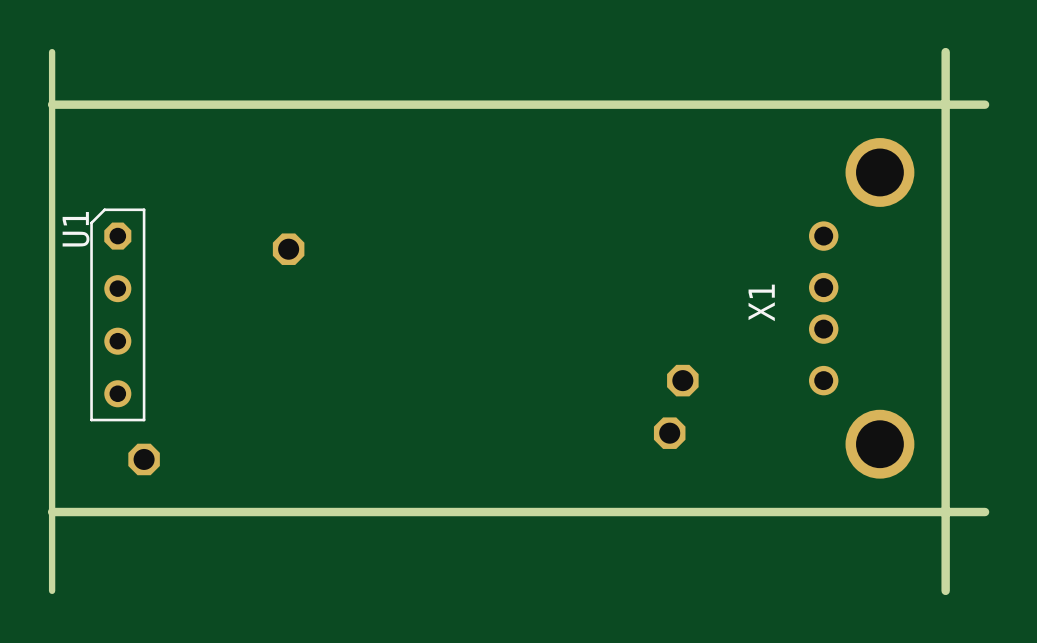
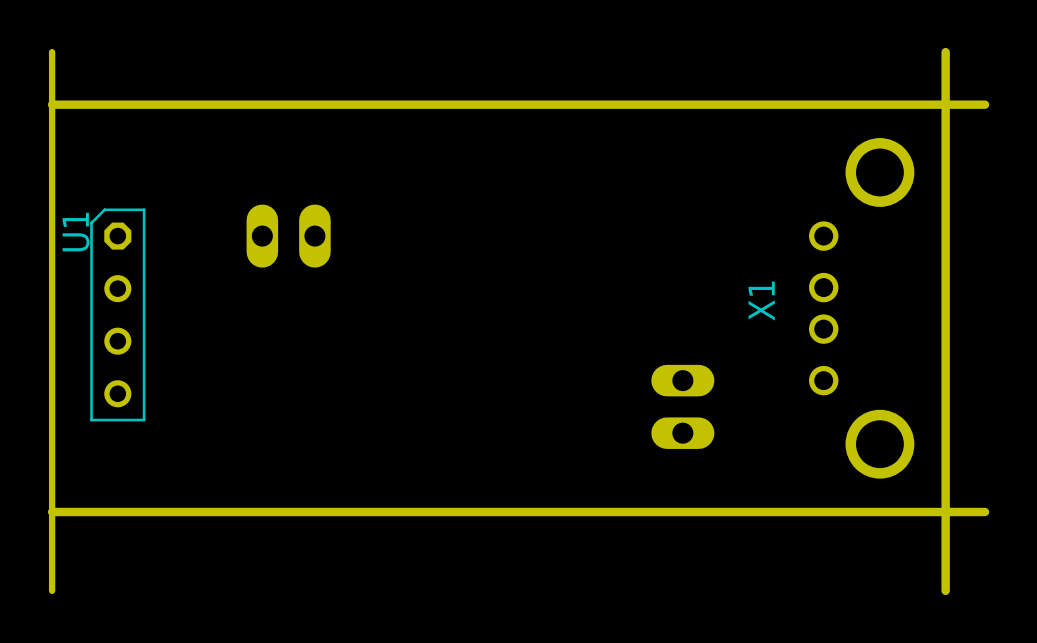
part footprint: [272, 233, 305, 265] -> [246, 204, 331, 268]
part: (682, 380) -> none
part: none -> (682, 406)
part: (669, 433) -> none
part: (144, 459) -> none

